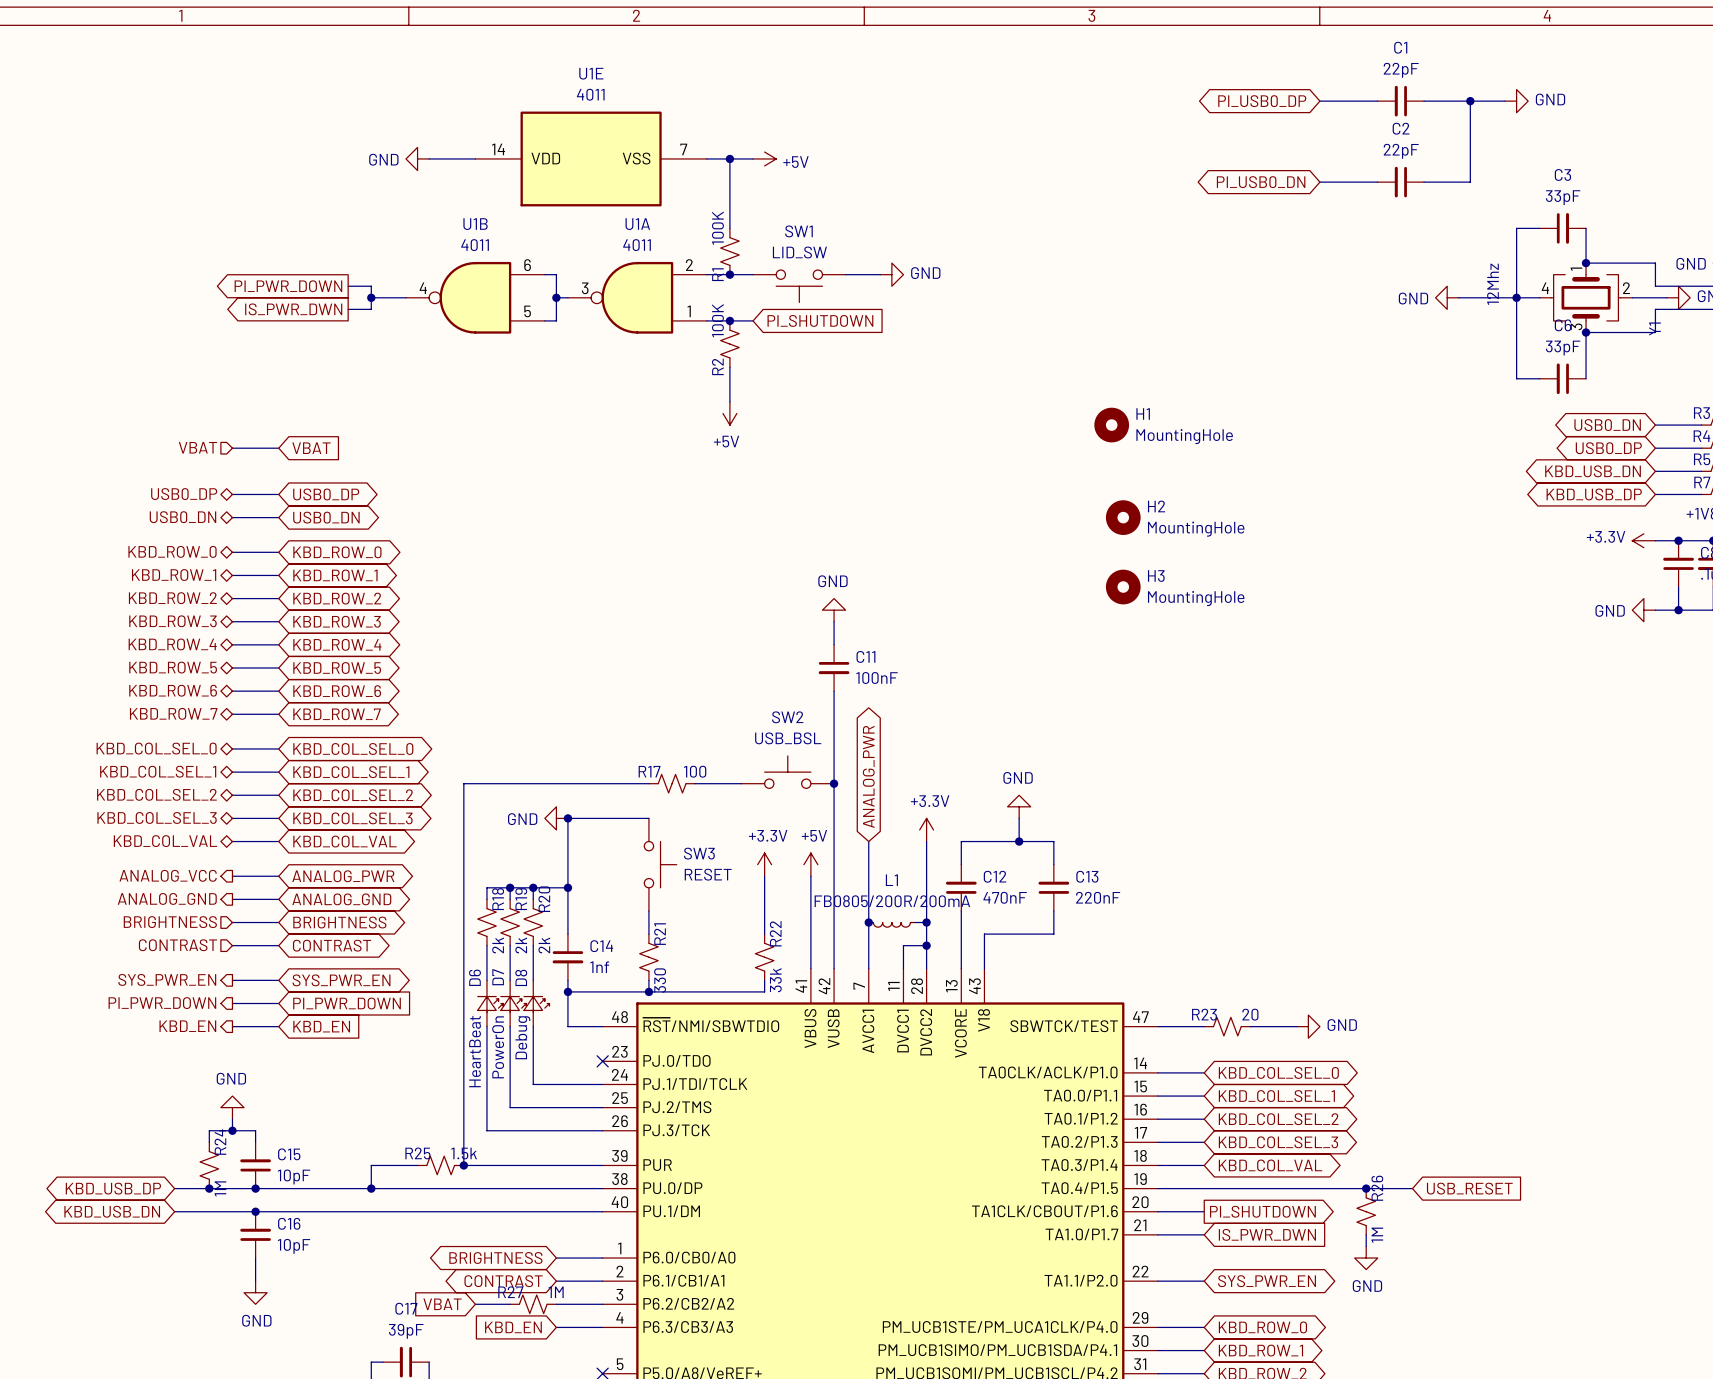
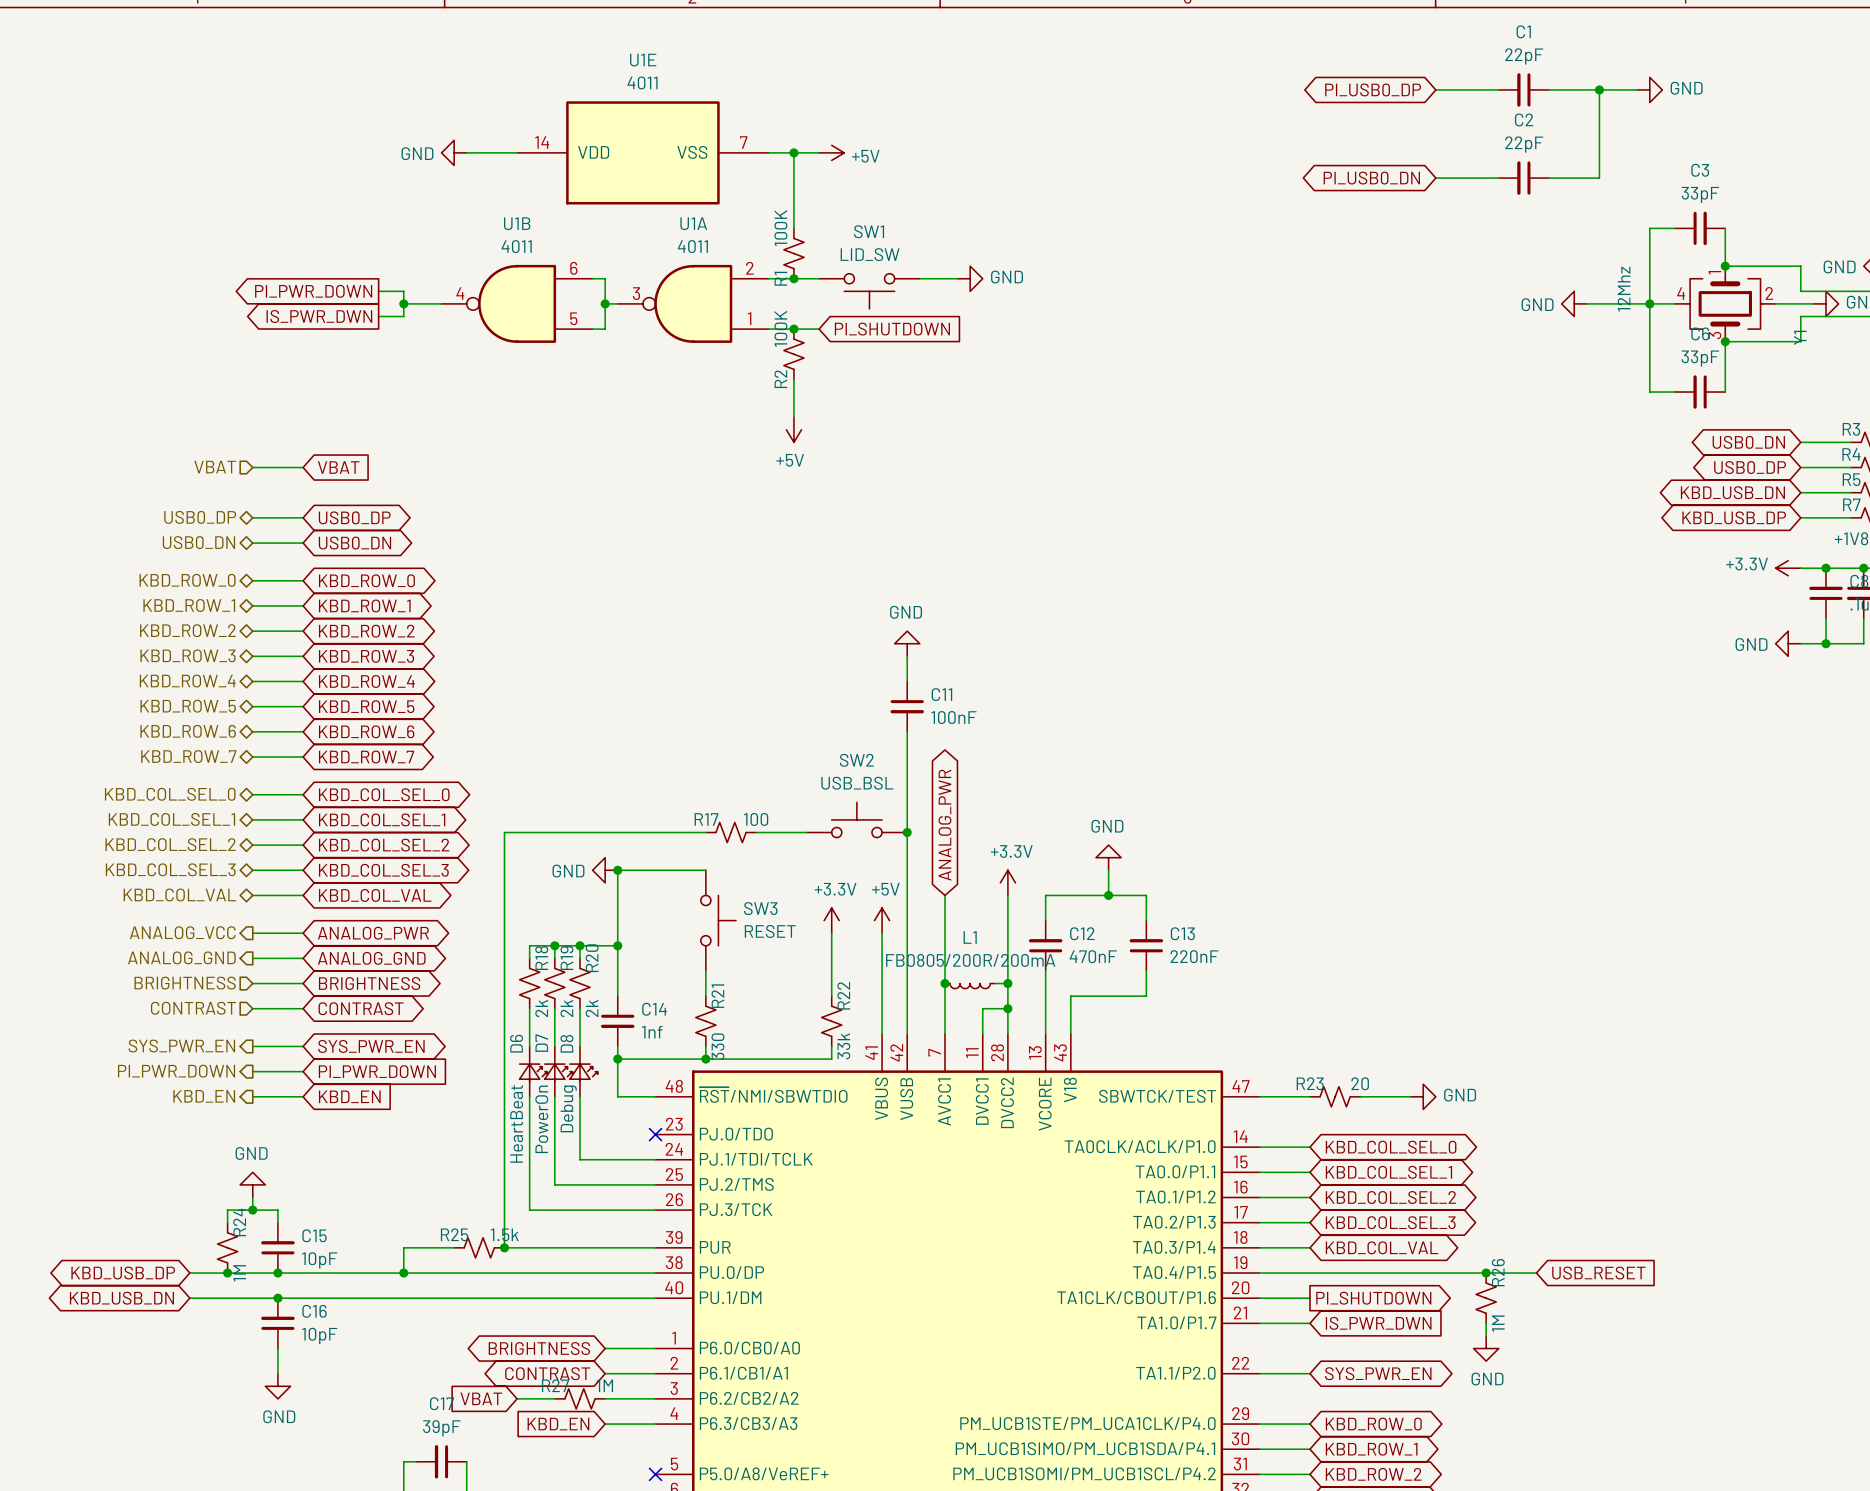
H1: MountingHole (1111, 425) -> none
H2: MountingHole (1123, 517) -> none
H3: MountingHole (1123, 587) -> none

